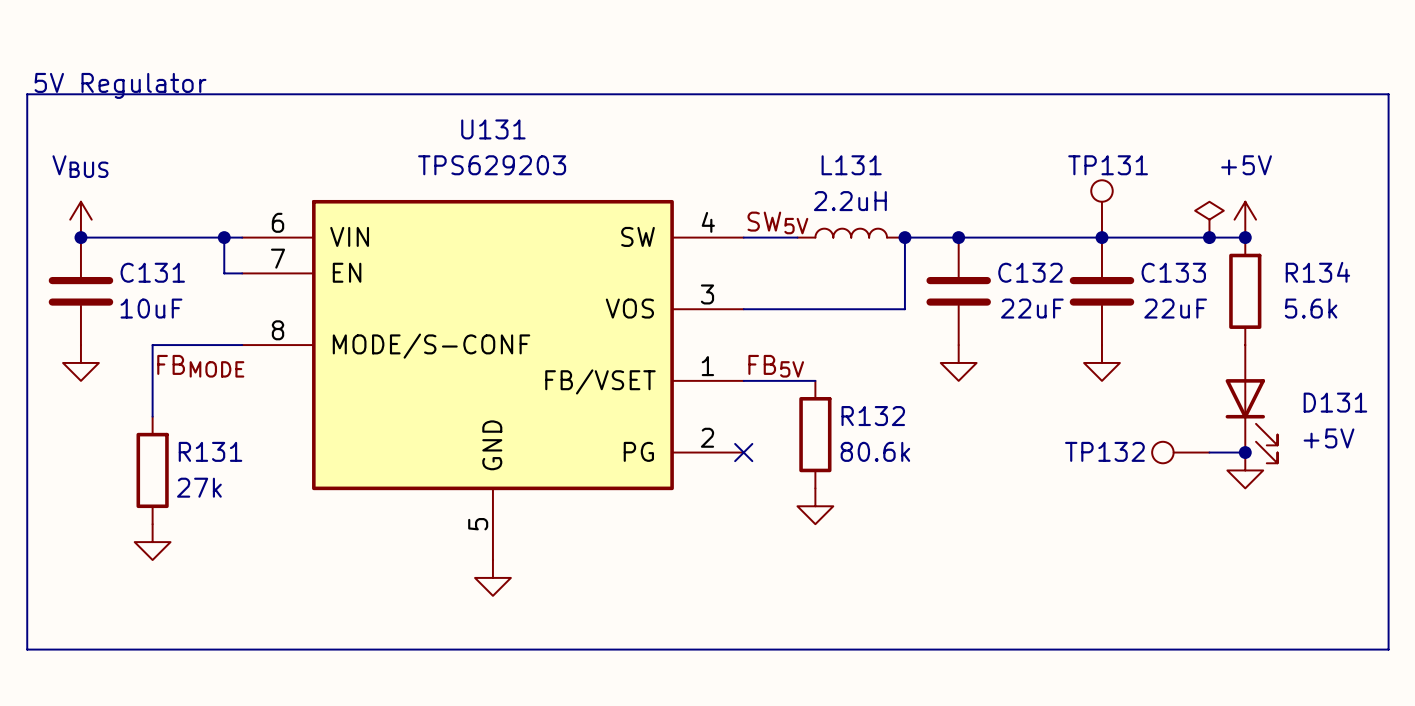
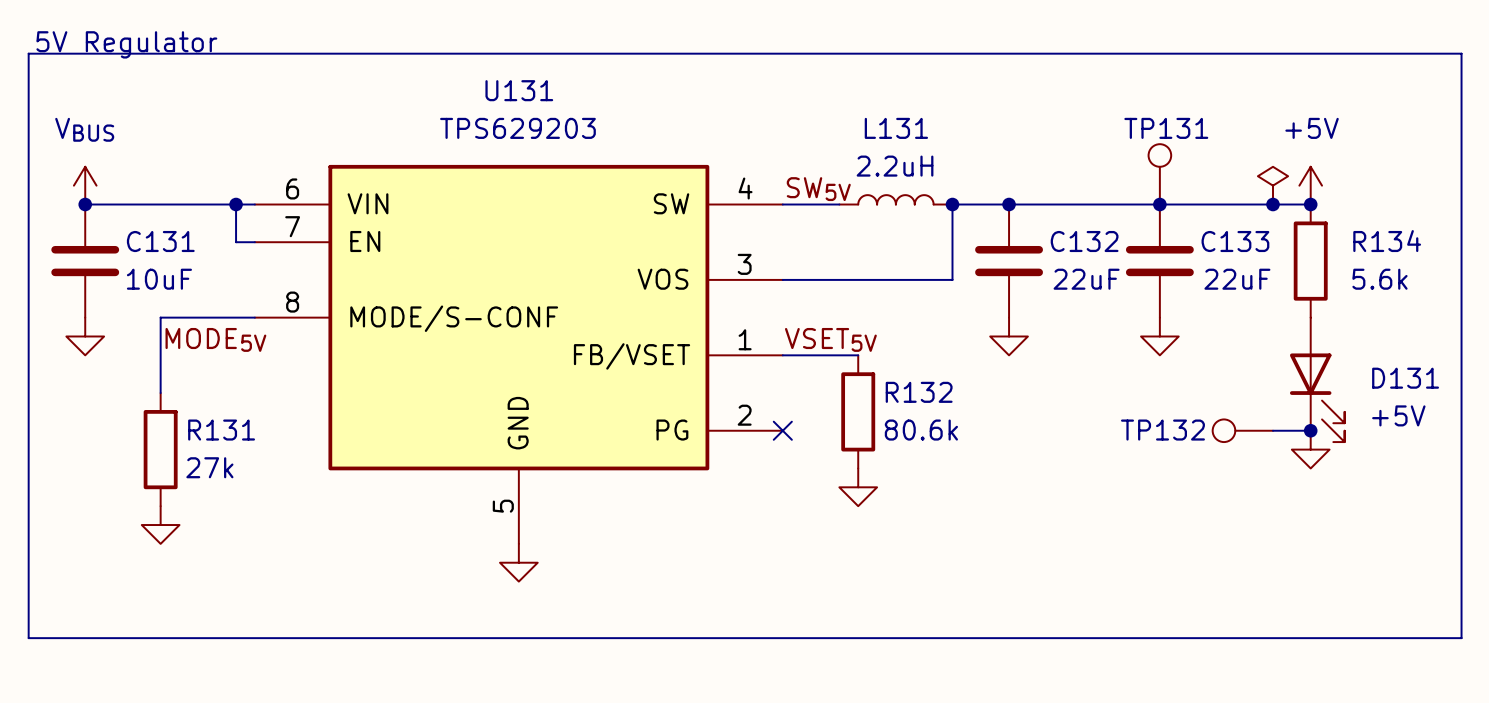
label: FBMODE (200, 366) -> MODE5V (215, 339)
label: FB5V (776, 366) -> VSET5V (830, 339)

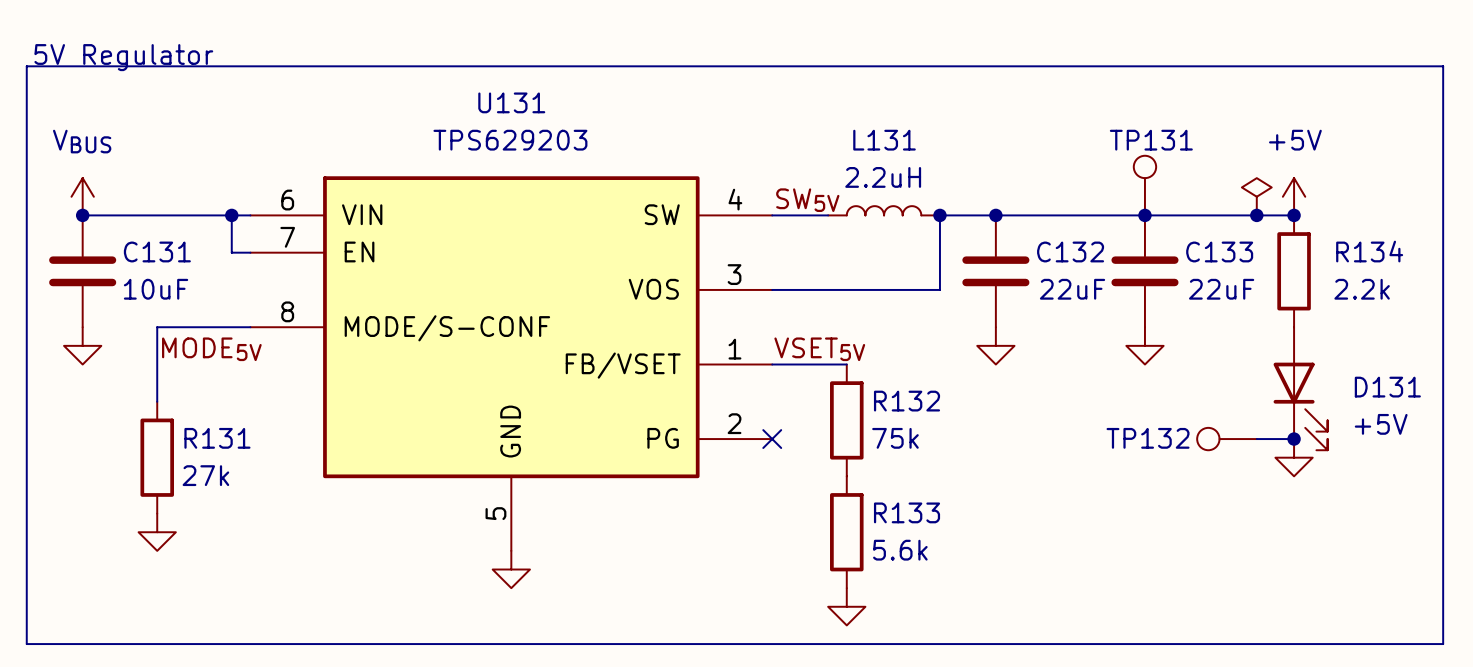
R134 value: 5.6k (1379, 279) -> 2.2k (1362, 289)
R132 value: 80.6k (921, 430) -> 75k (895, 438)
power symbol position: (858, 487) -> (846, 606)
R133: none -> 5.6k (846, 532)

